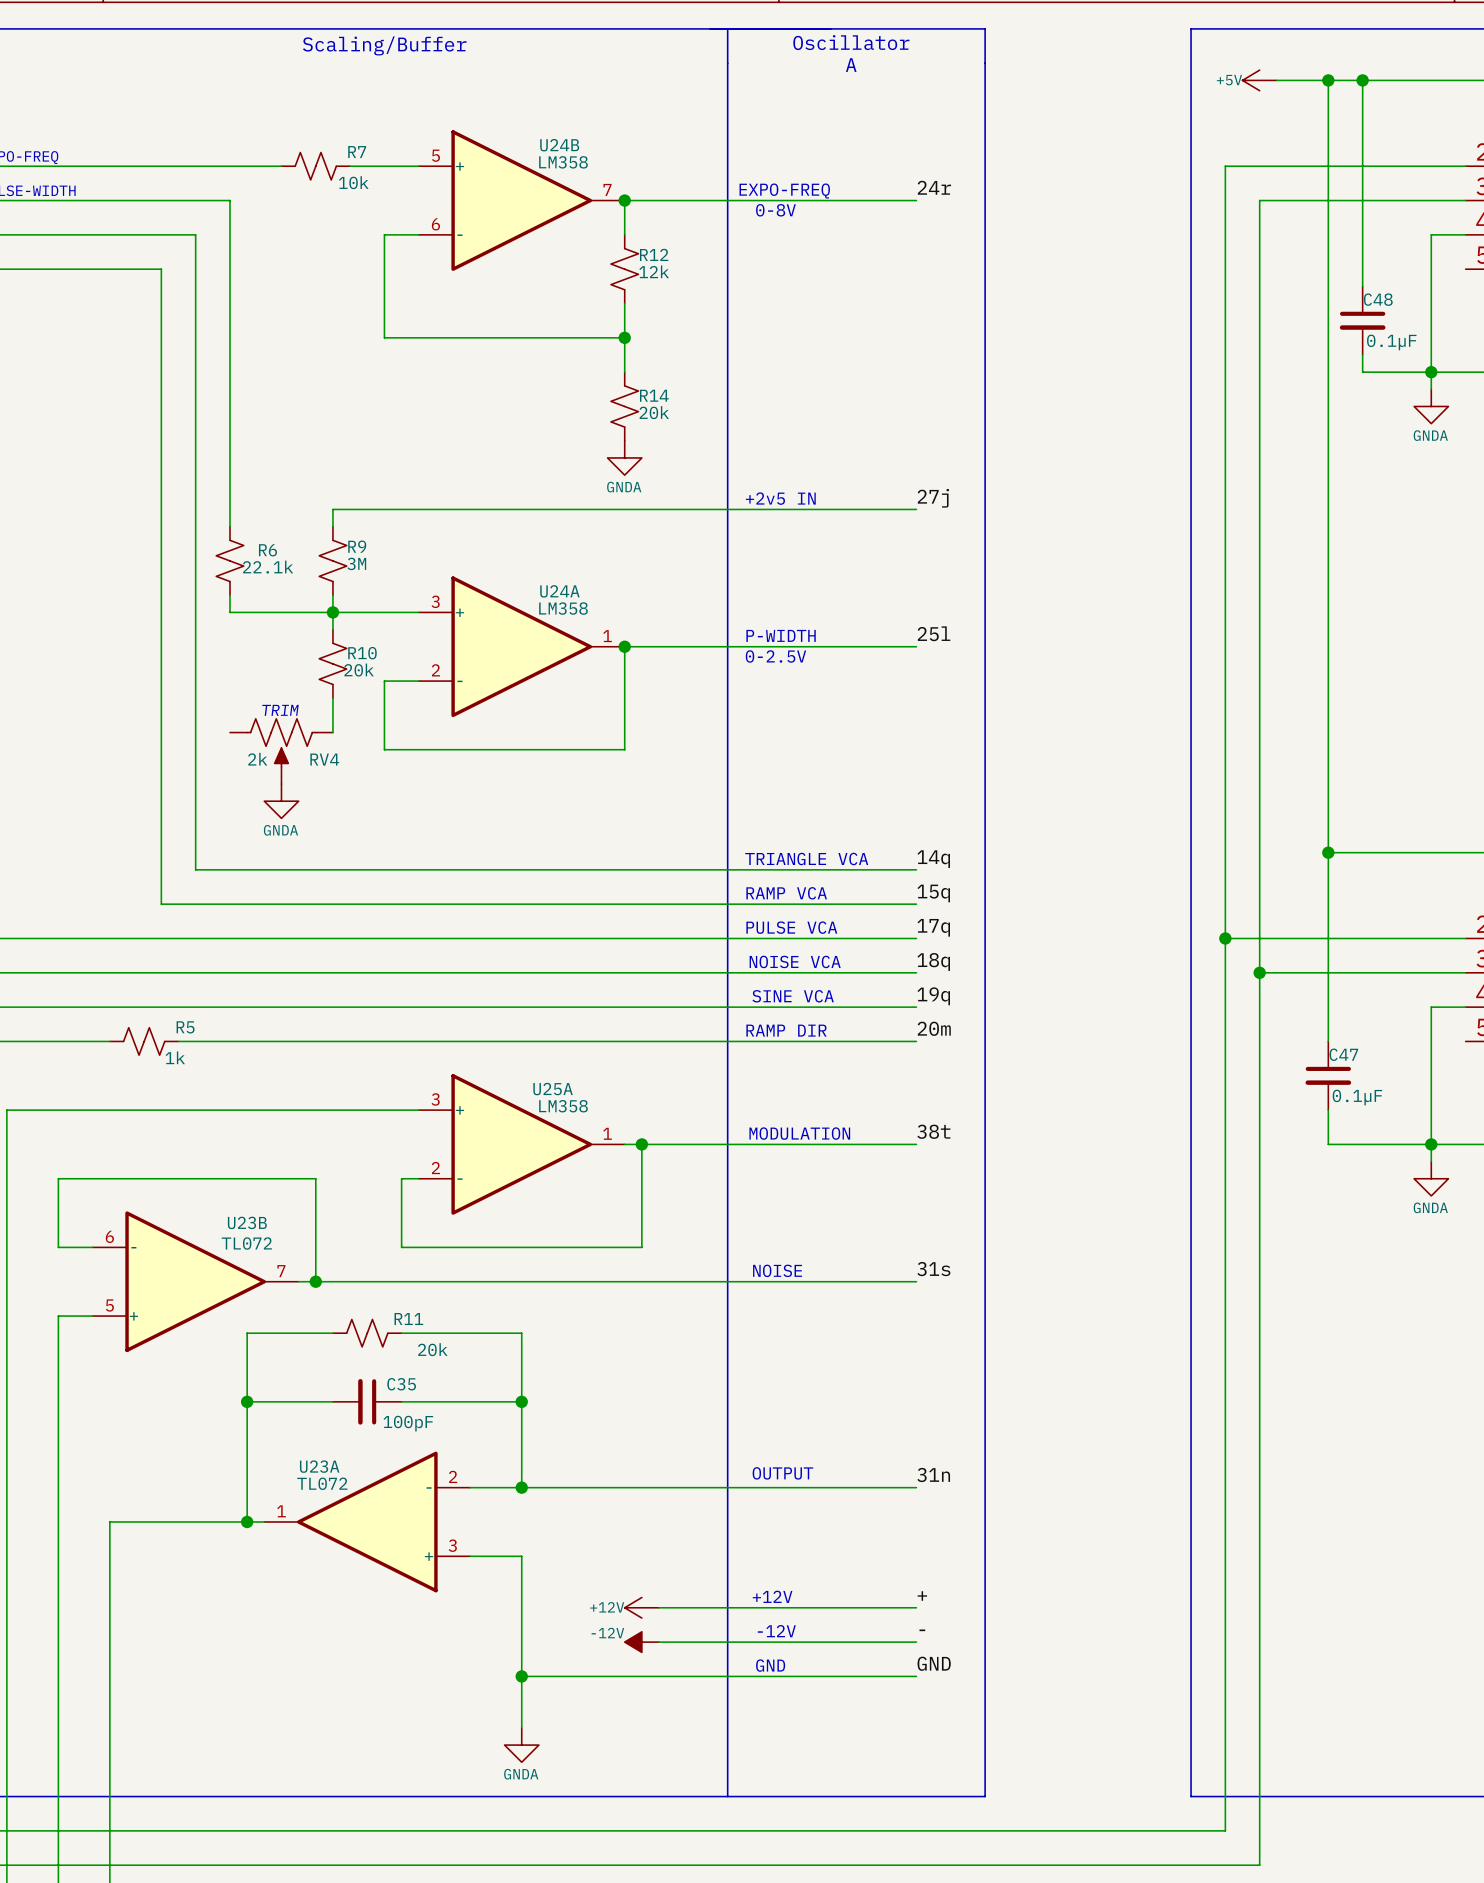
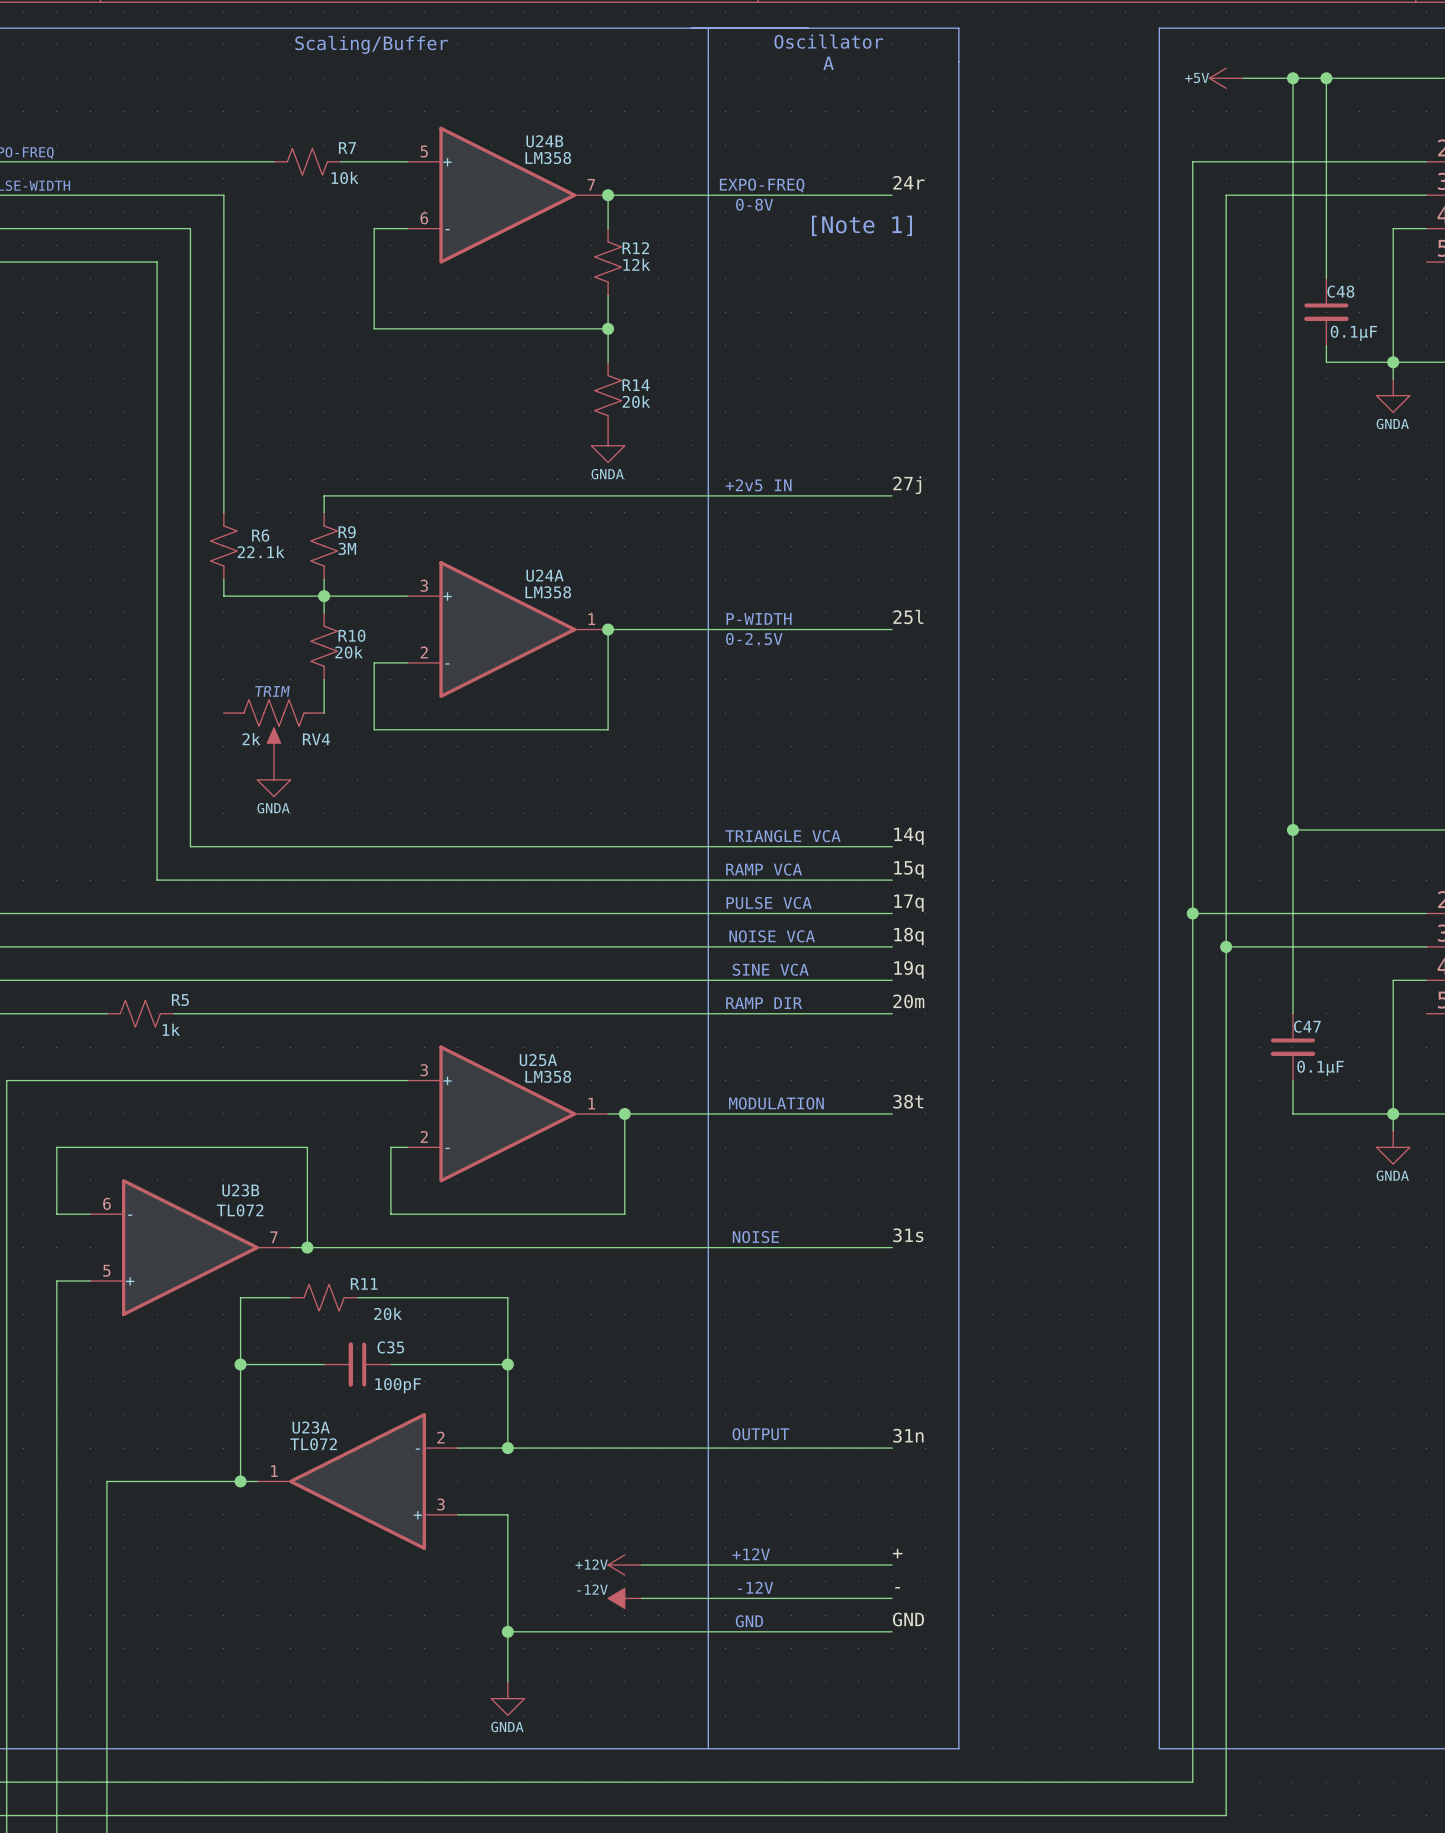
text: none -> [Note 1] (861, 225)
wire: (298, 1333) (332, 1333) -> (357, 1297) (390, 1297)
R11 position: (367, 1333) -> (324, 1297)

